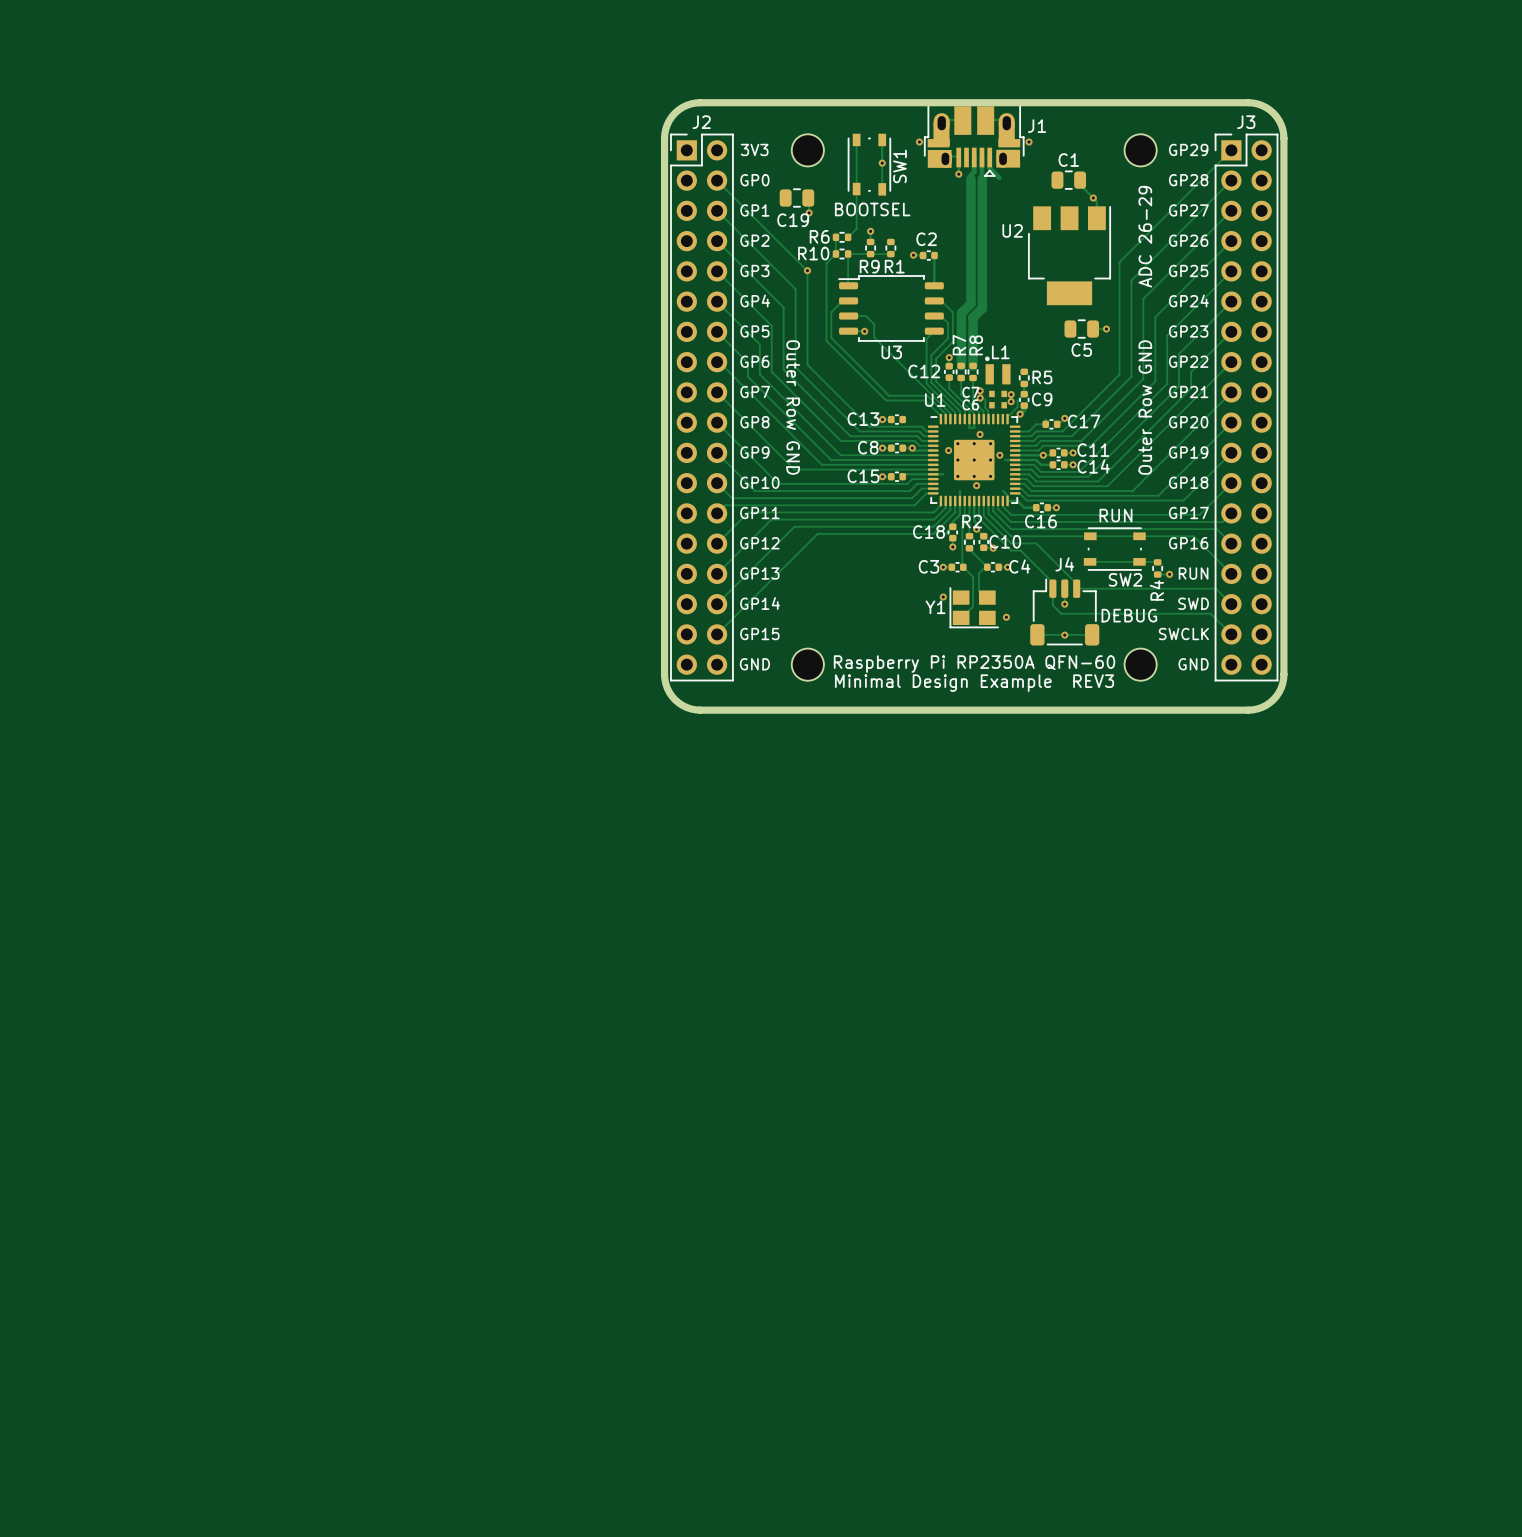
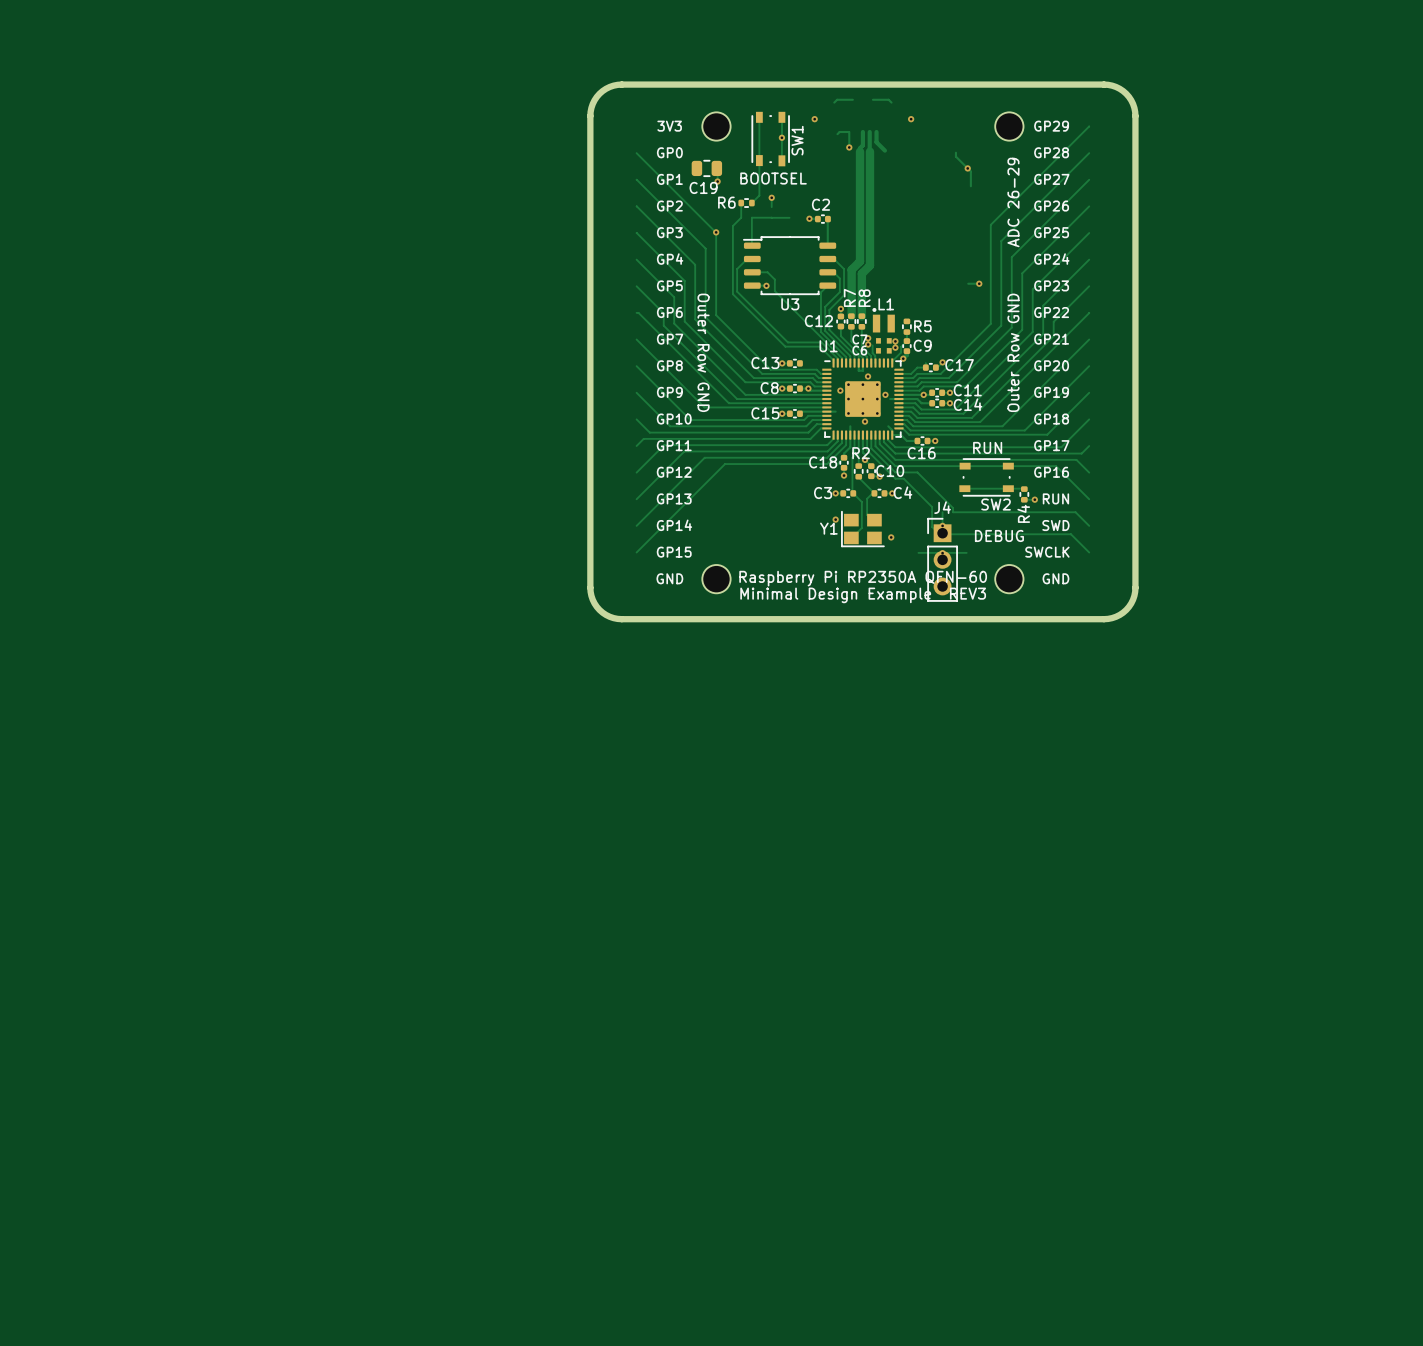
J1: (974, 139) -> none
C1: (1068, 180) -> none
R9: (870, 248) -> none
R1: (890, 248) -> none
R10: (842, 253) -> none
U2: (1069, 255) -> none
C5: (1081, 329) -> none
J2: (701, 407) -> none
J3: (1246, 407) -> none
J4 footprint: [1030, 578, 1100, 646] -> [927, 518, 958, 602]

